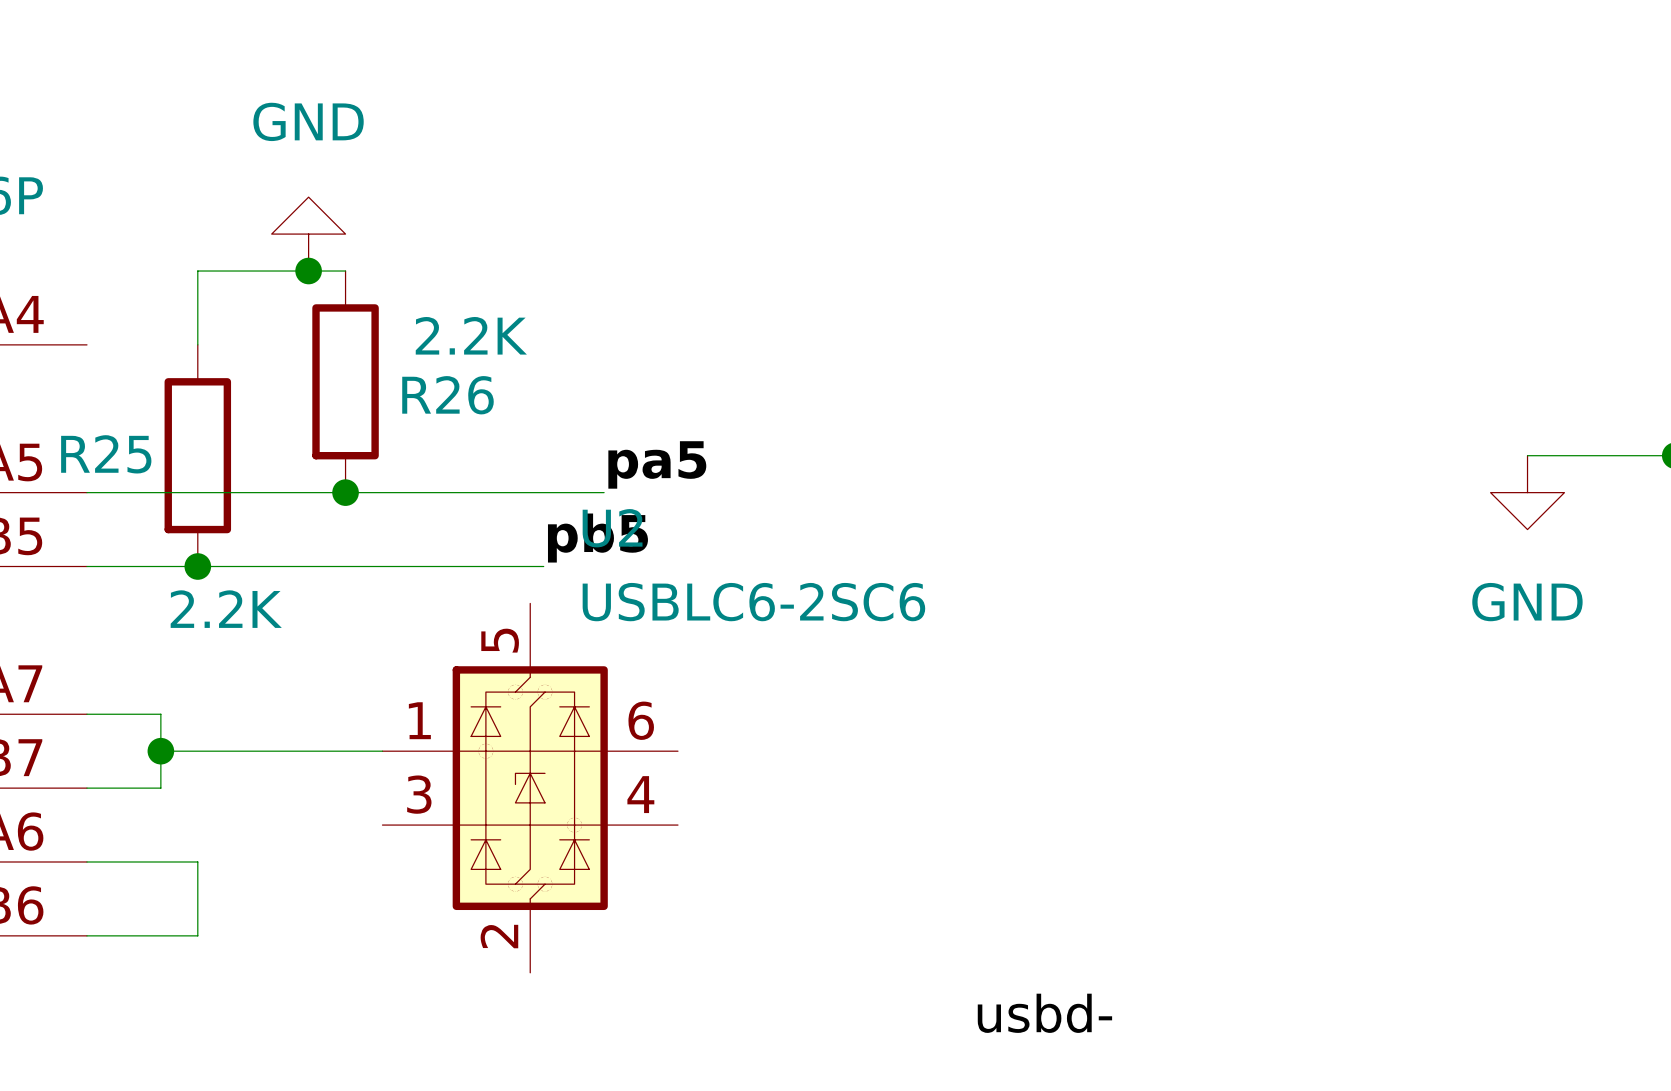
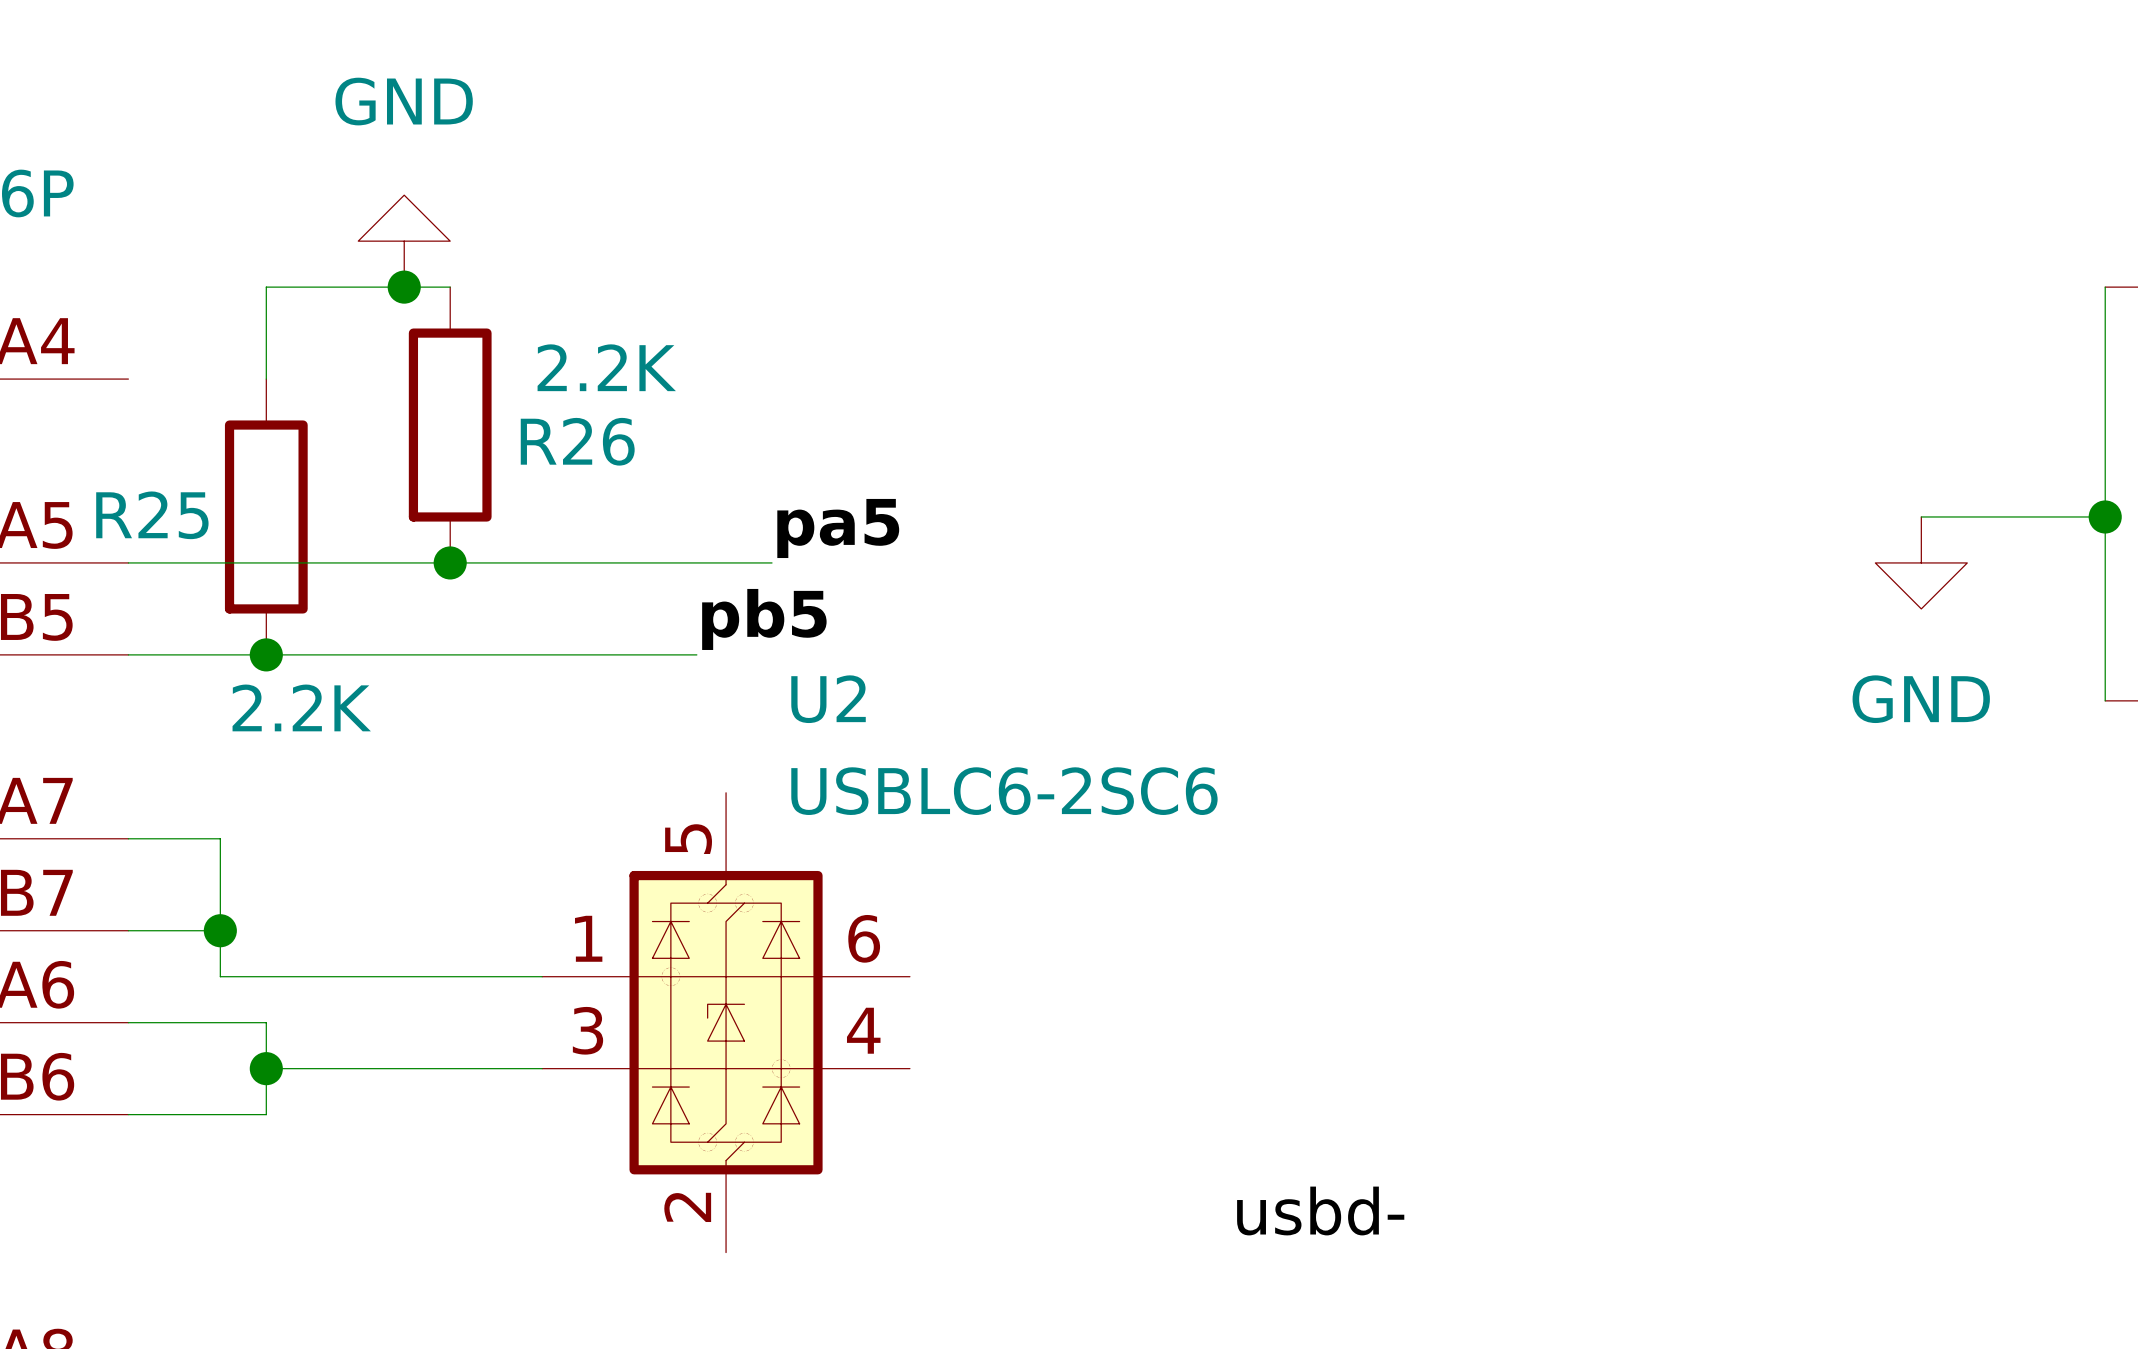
wire: (160, 751) (382, 751) -> (266, 1068) (542, 1068)
junction position: (160, 751) -> (220, 930)
wire: none -> (220, 930) (220, 976) (542, 976)
U2 position: (530, 788) -> (726, 1022)
junction: none -> (266, 1068)

